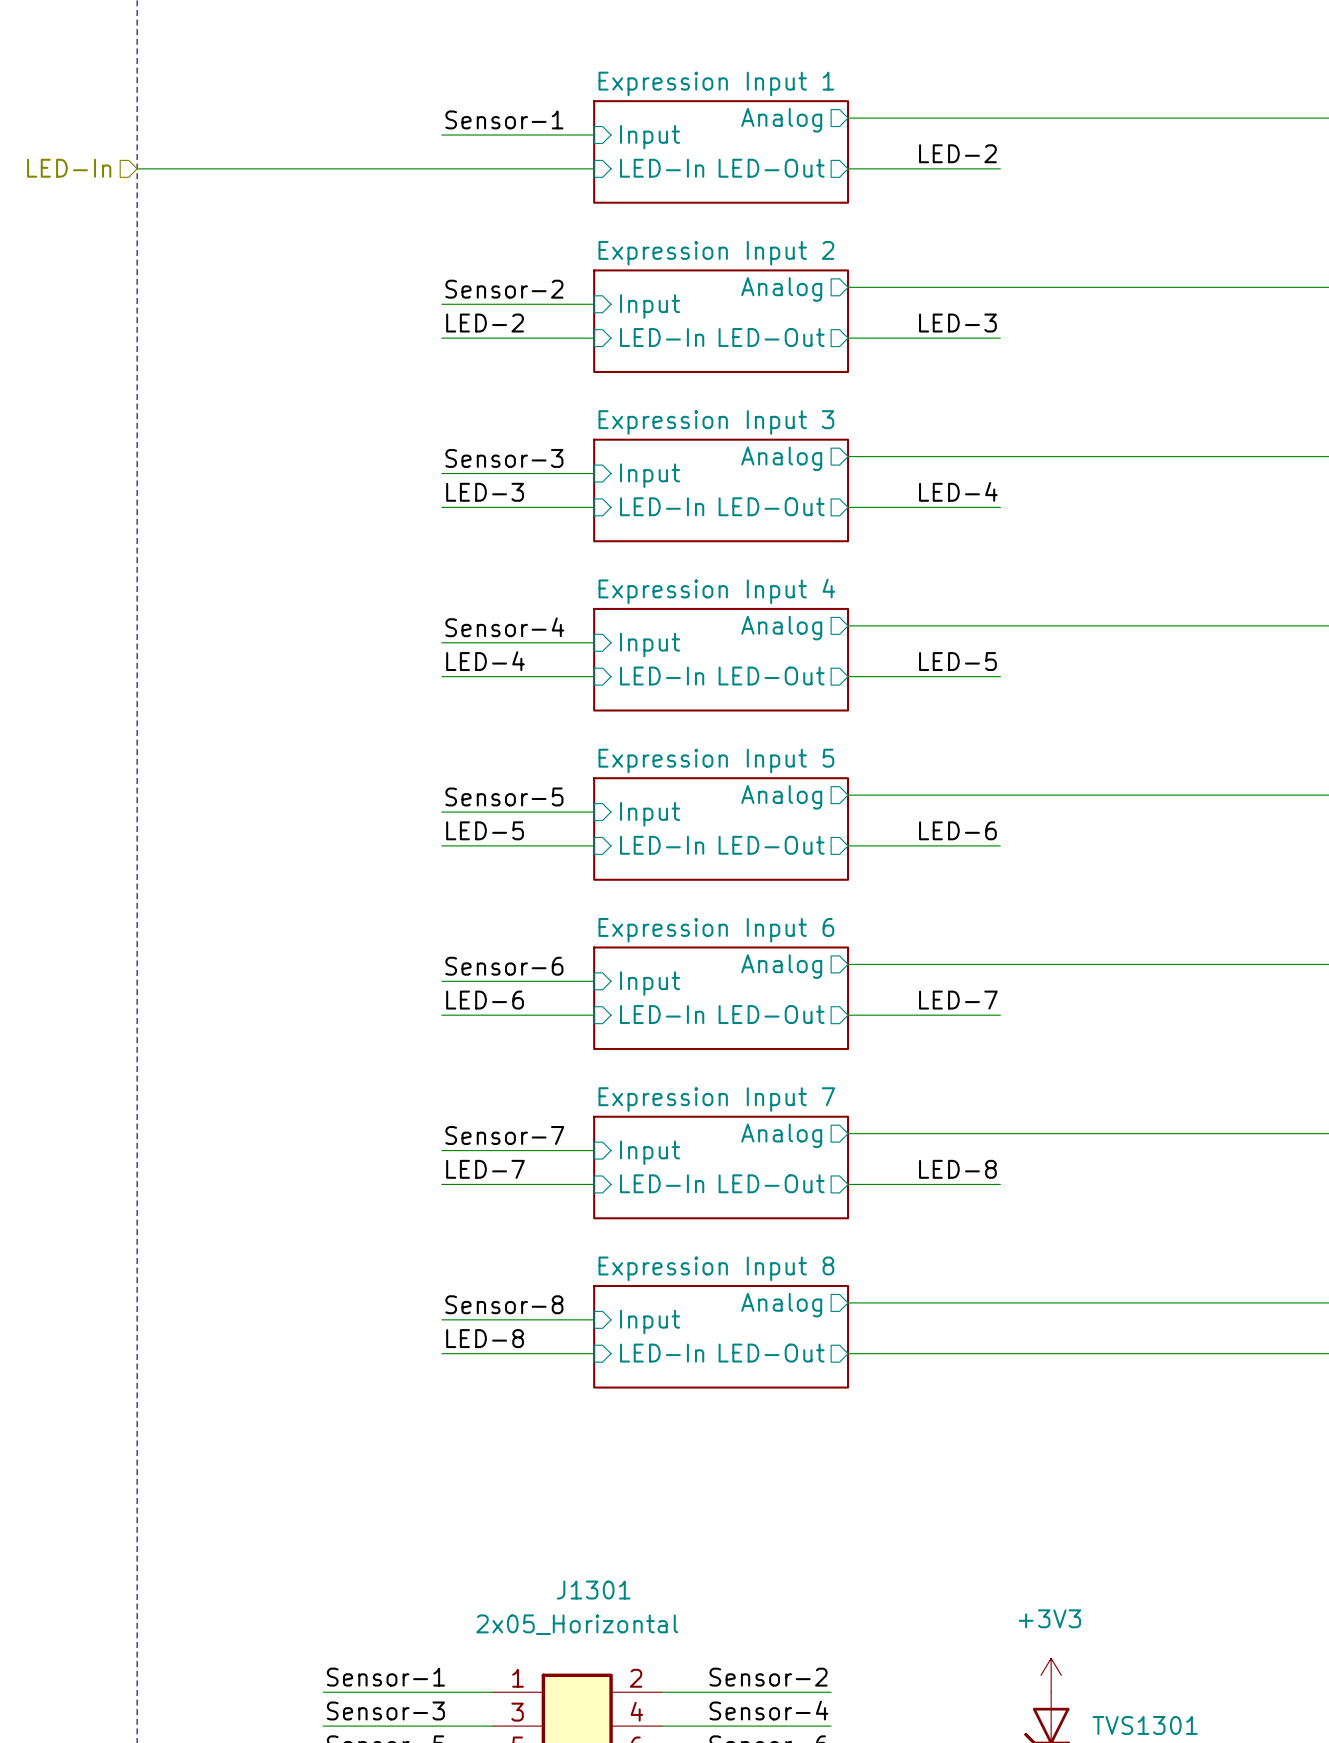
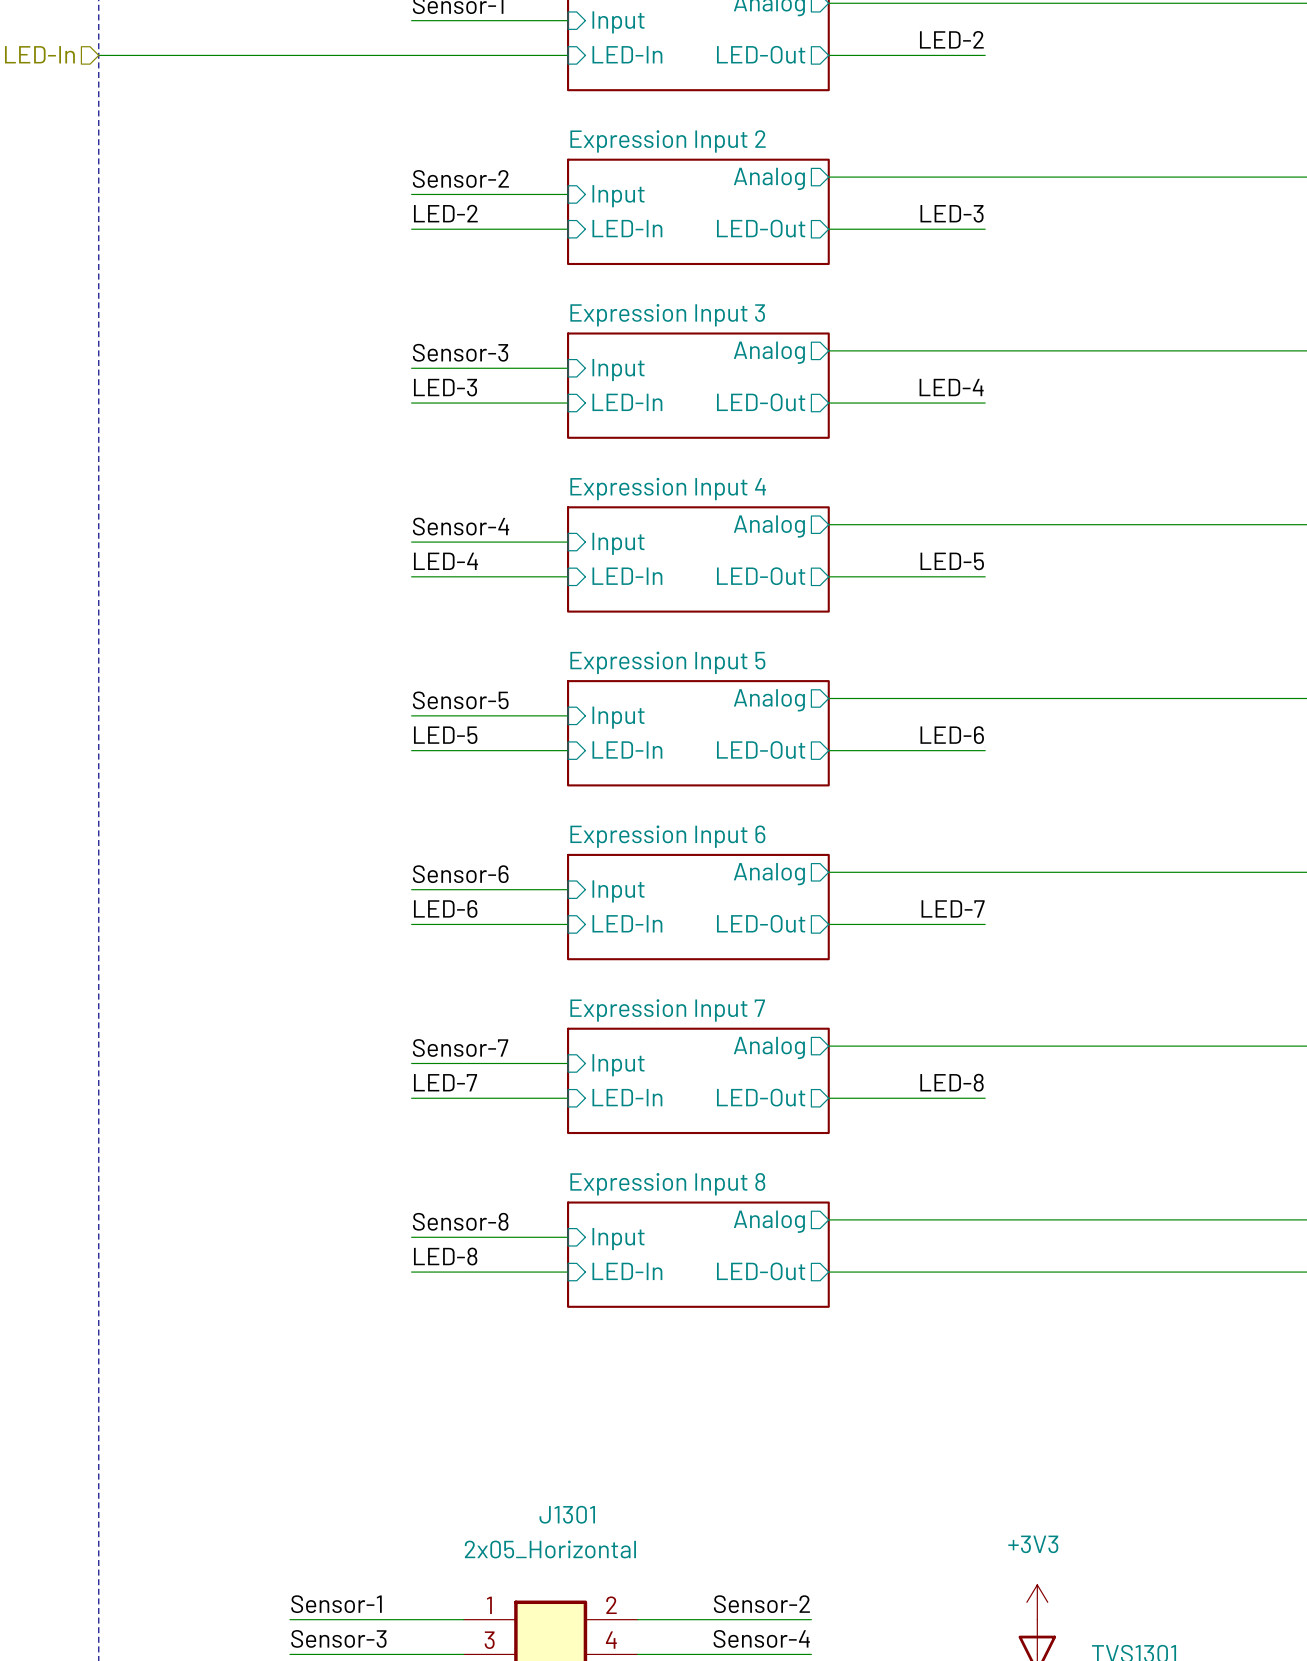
power symbol text position: +3V3 (1049, 1618) -> +3V3 (1033, 1544)

